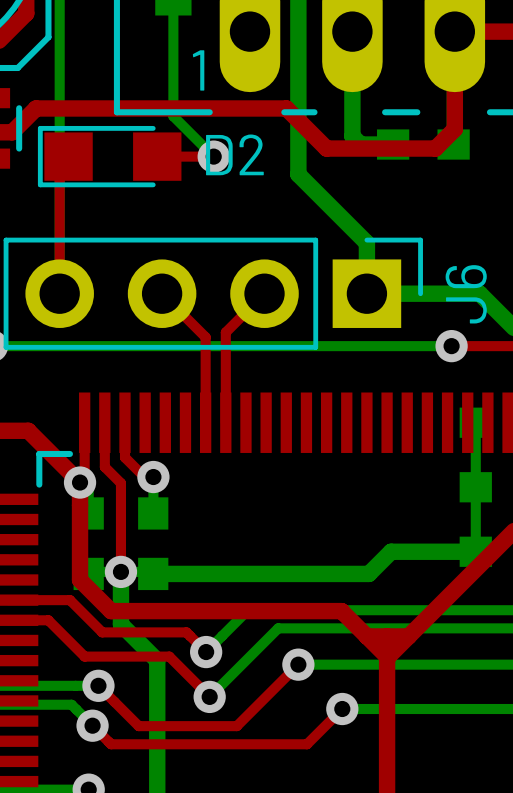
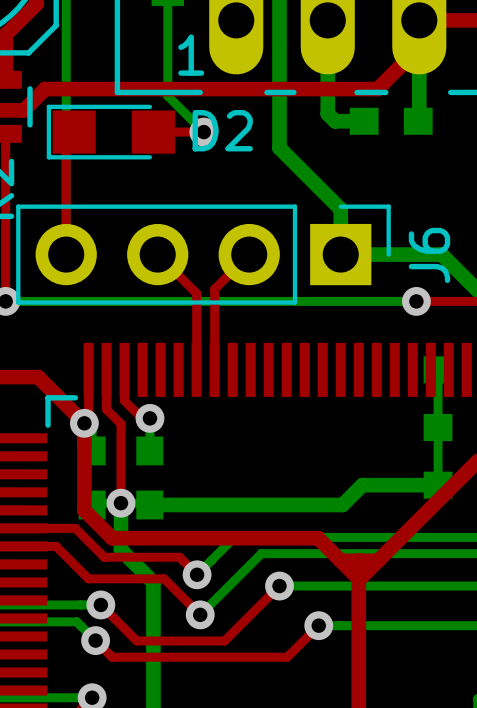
top track: (454, 61) (454, 129) (435, 148) (326, 148) (286, 108) -> (419, 47) (377, 89) (268, 89)

